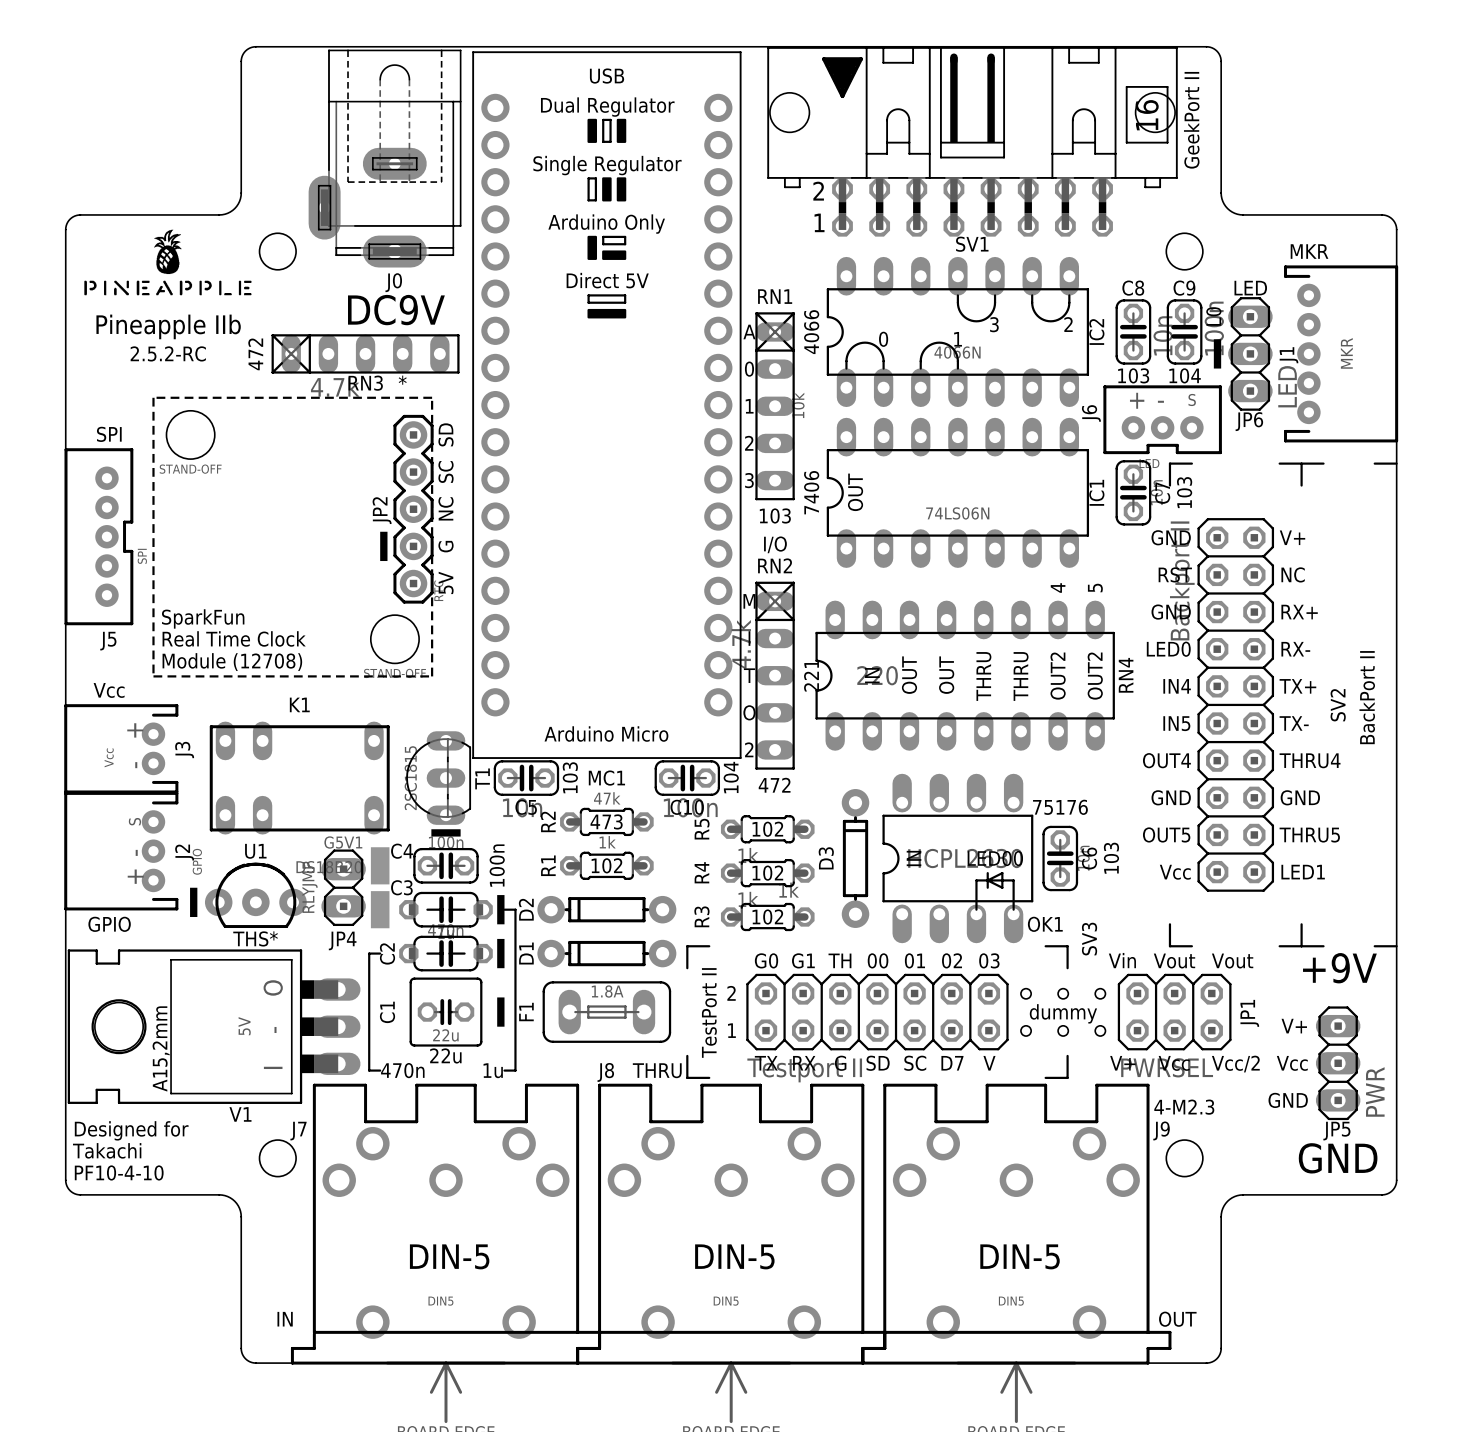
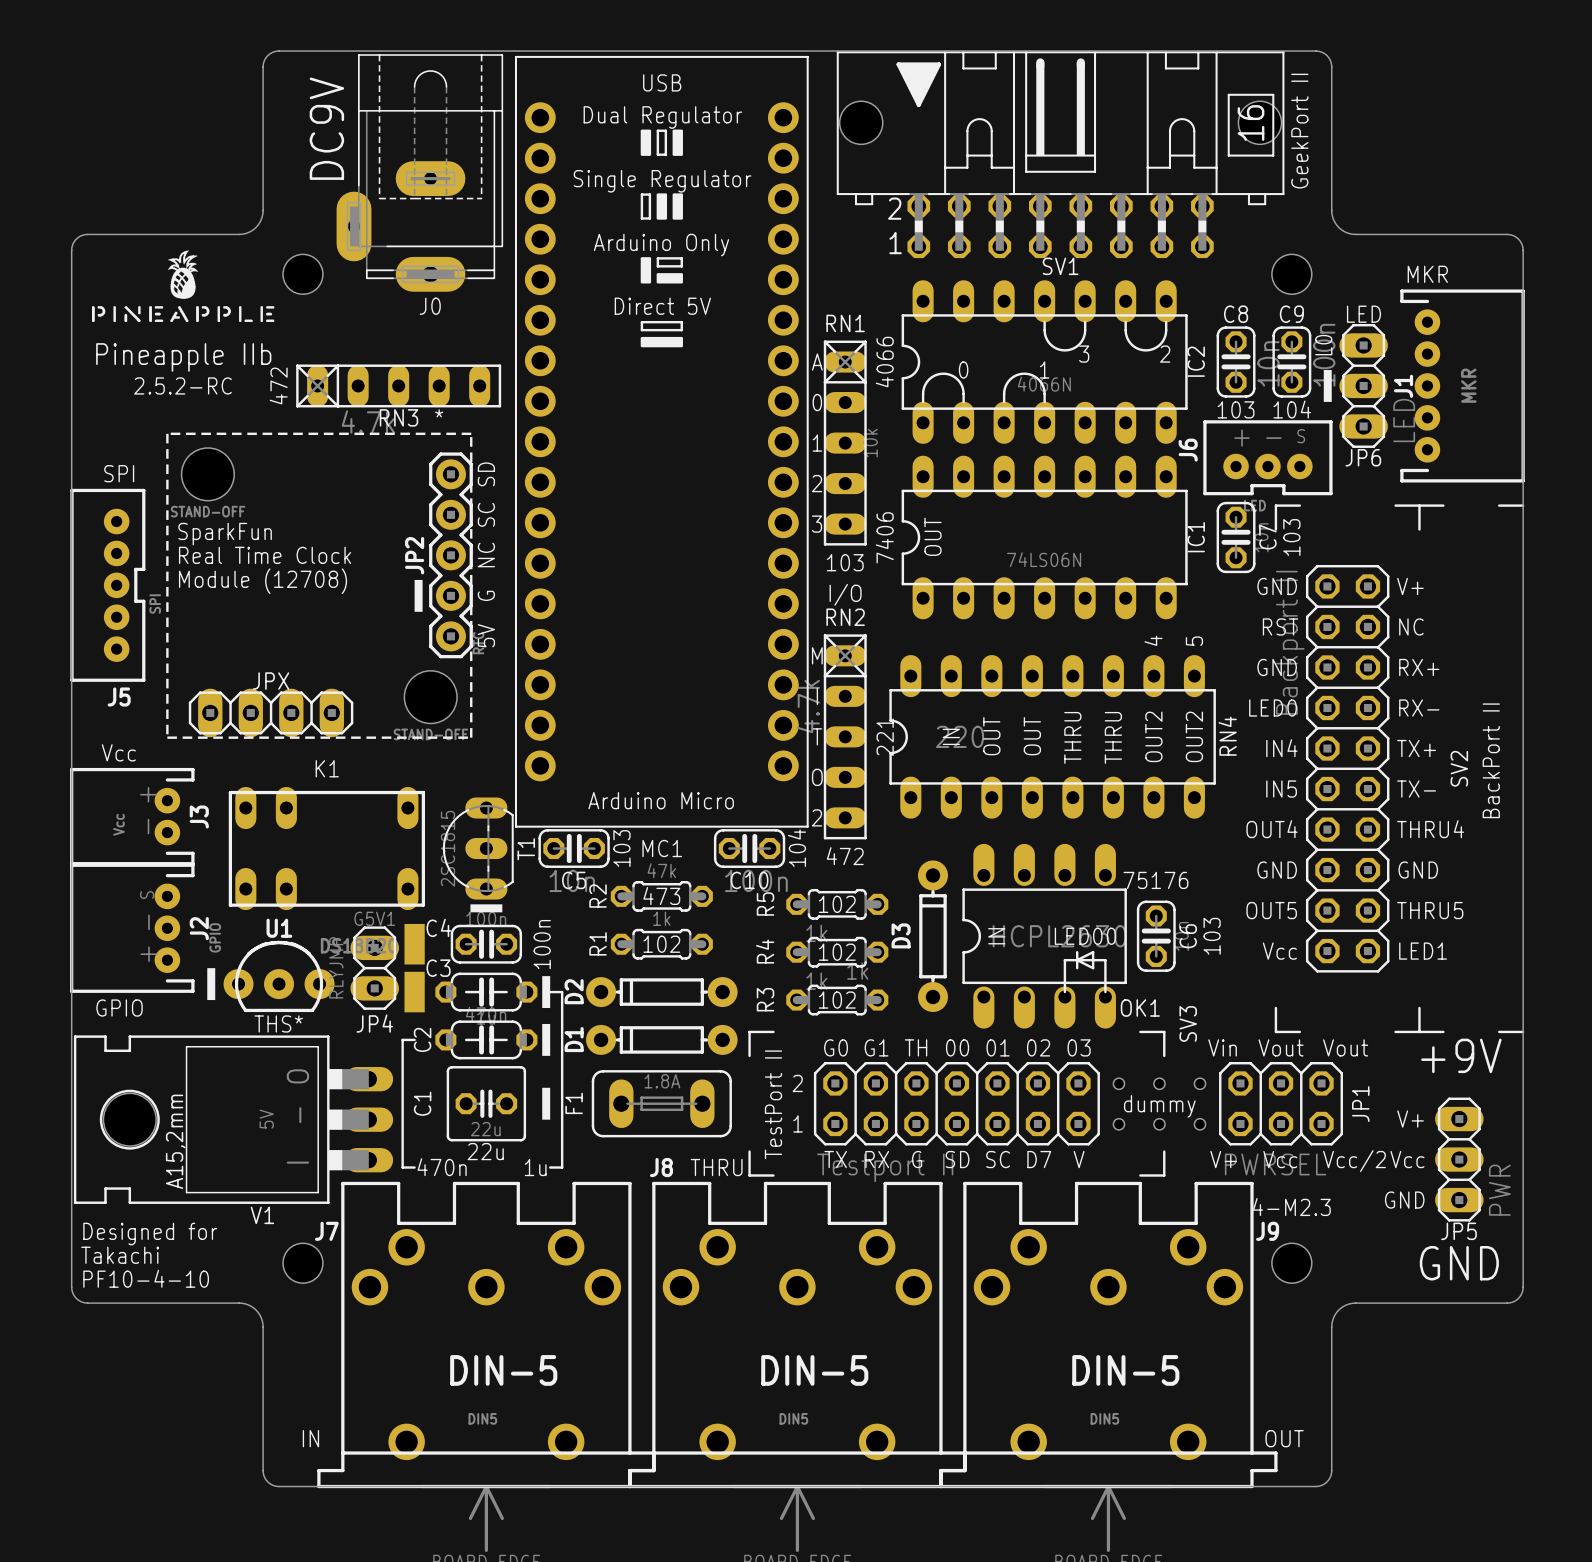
text rotation: 0° (396, 310) -> 90° counterclockwise (326, 128)
text position: DC9V (396, 310) -> DC9V (326, 128)
text position: SparkFun (203, 618) -> SparkFun (225, 534)
text position: Real Time Clock (234, 638) -> Real Time Clock (265, 555)
JPX: none -> (271, 712)
text position: Module (12708) (232, 662) -> Module (12708) (263, 581)

